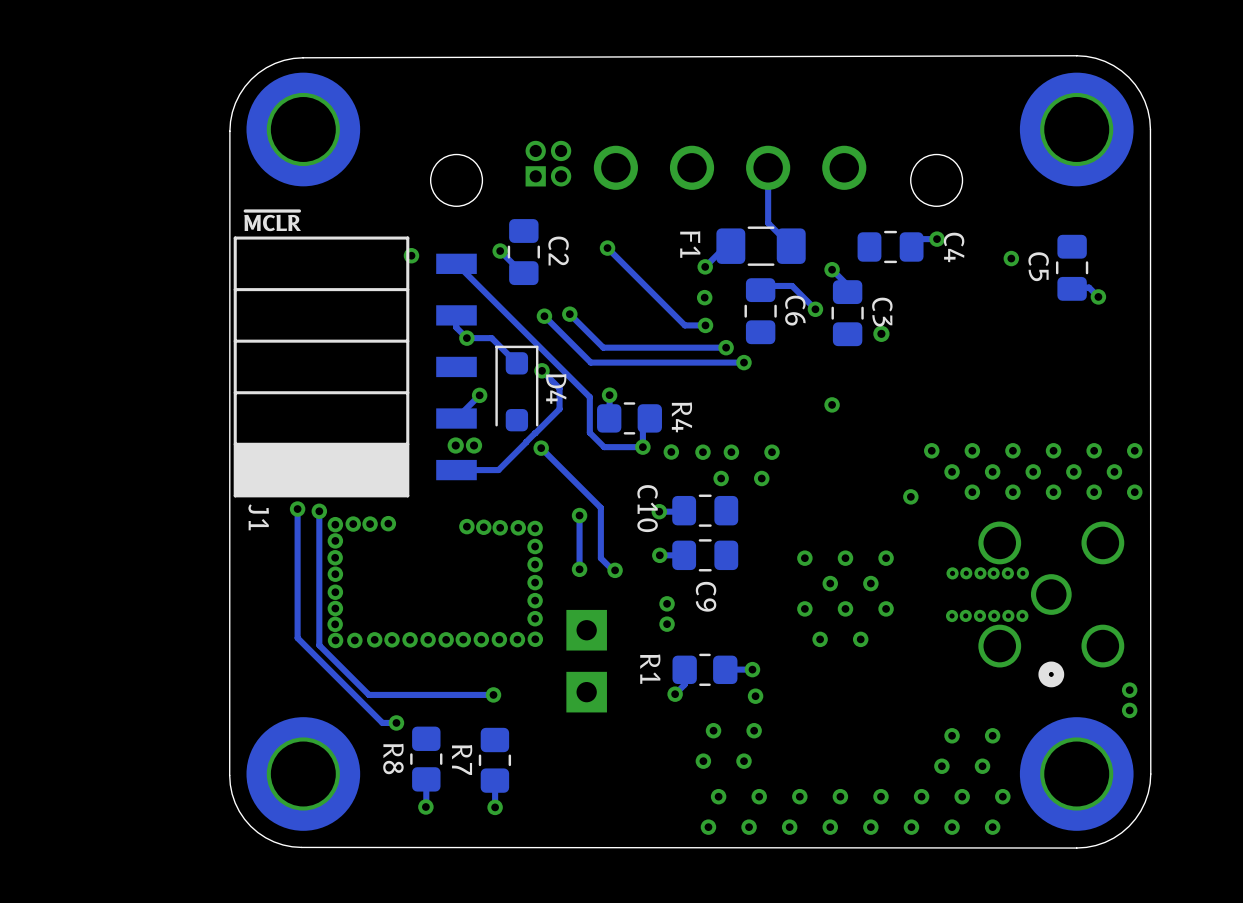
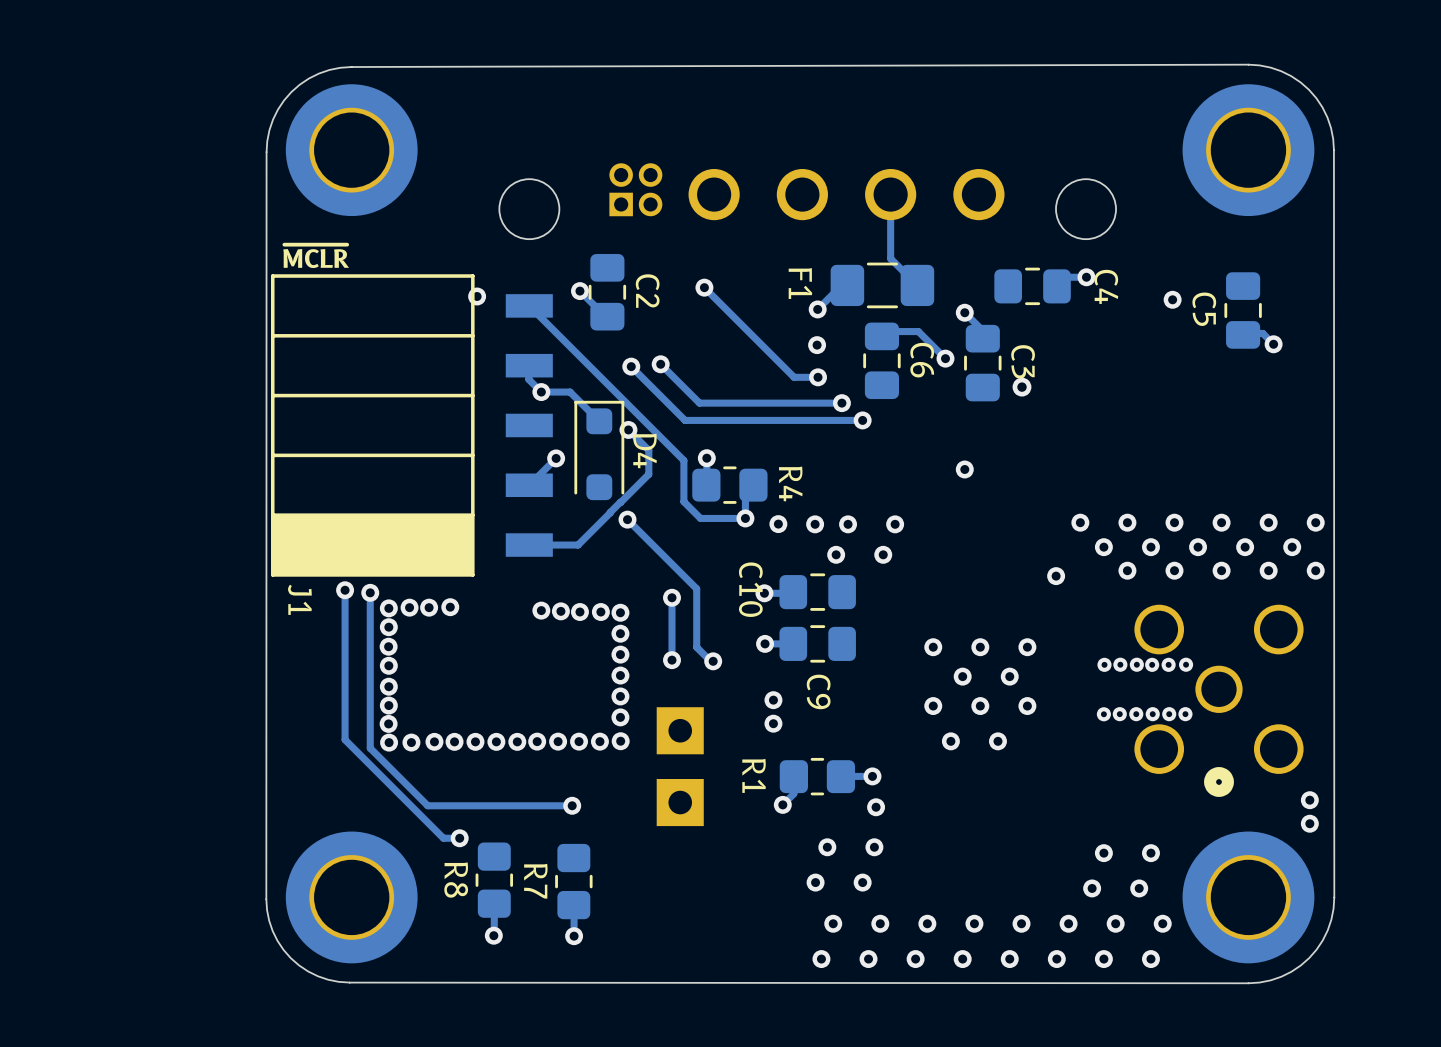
via: (455, 445) -> none
via: (474, 445) -> none

